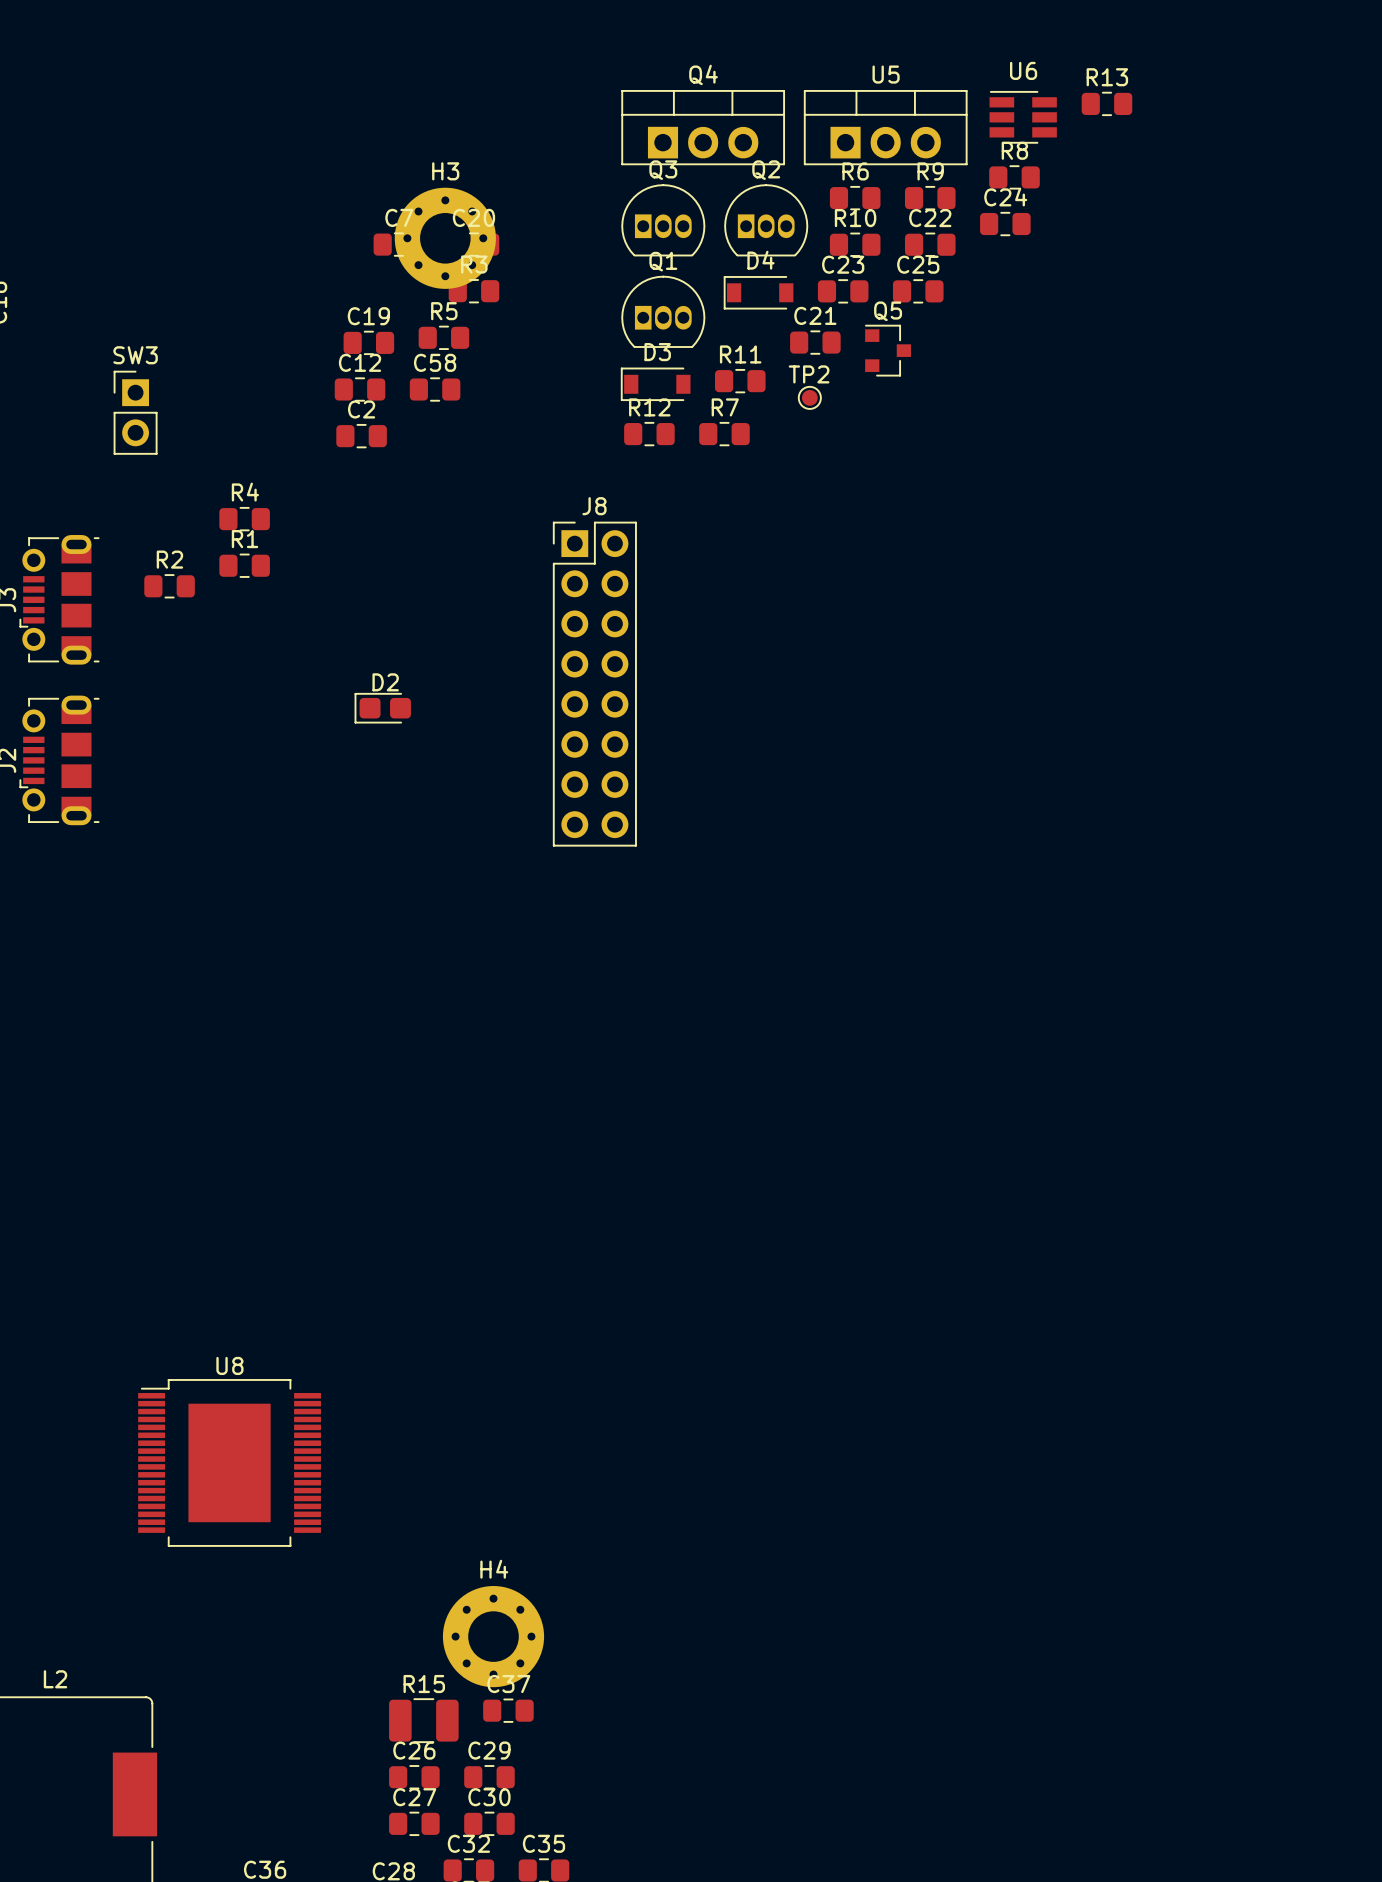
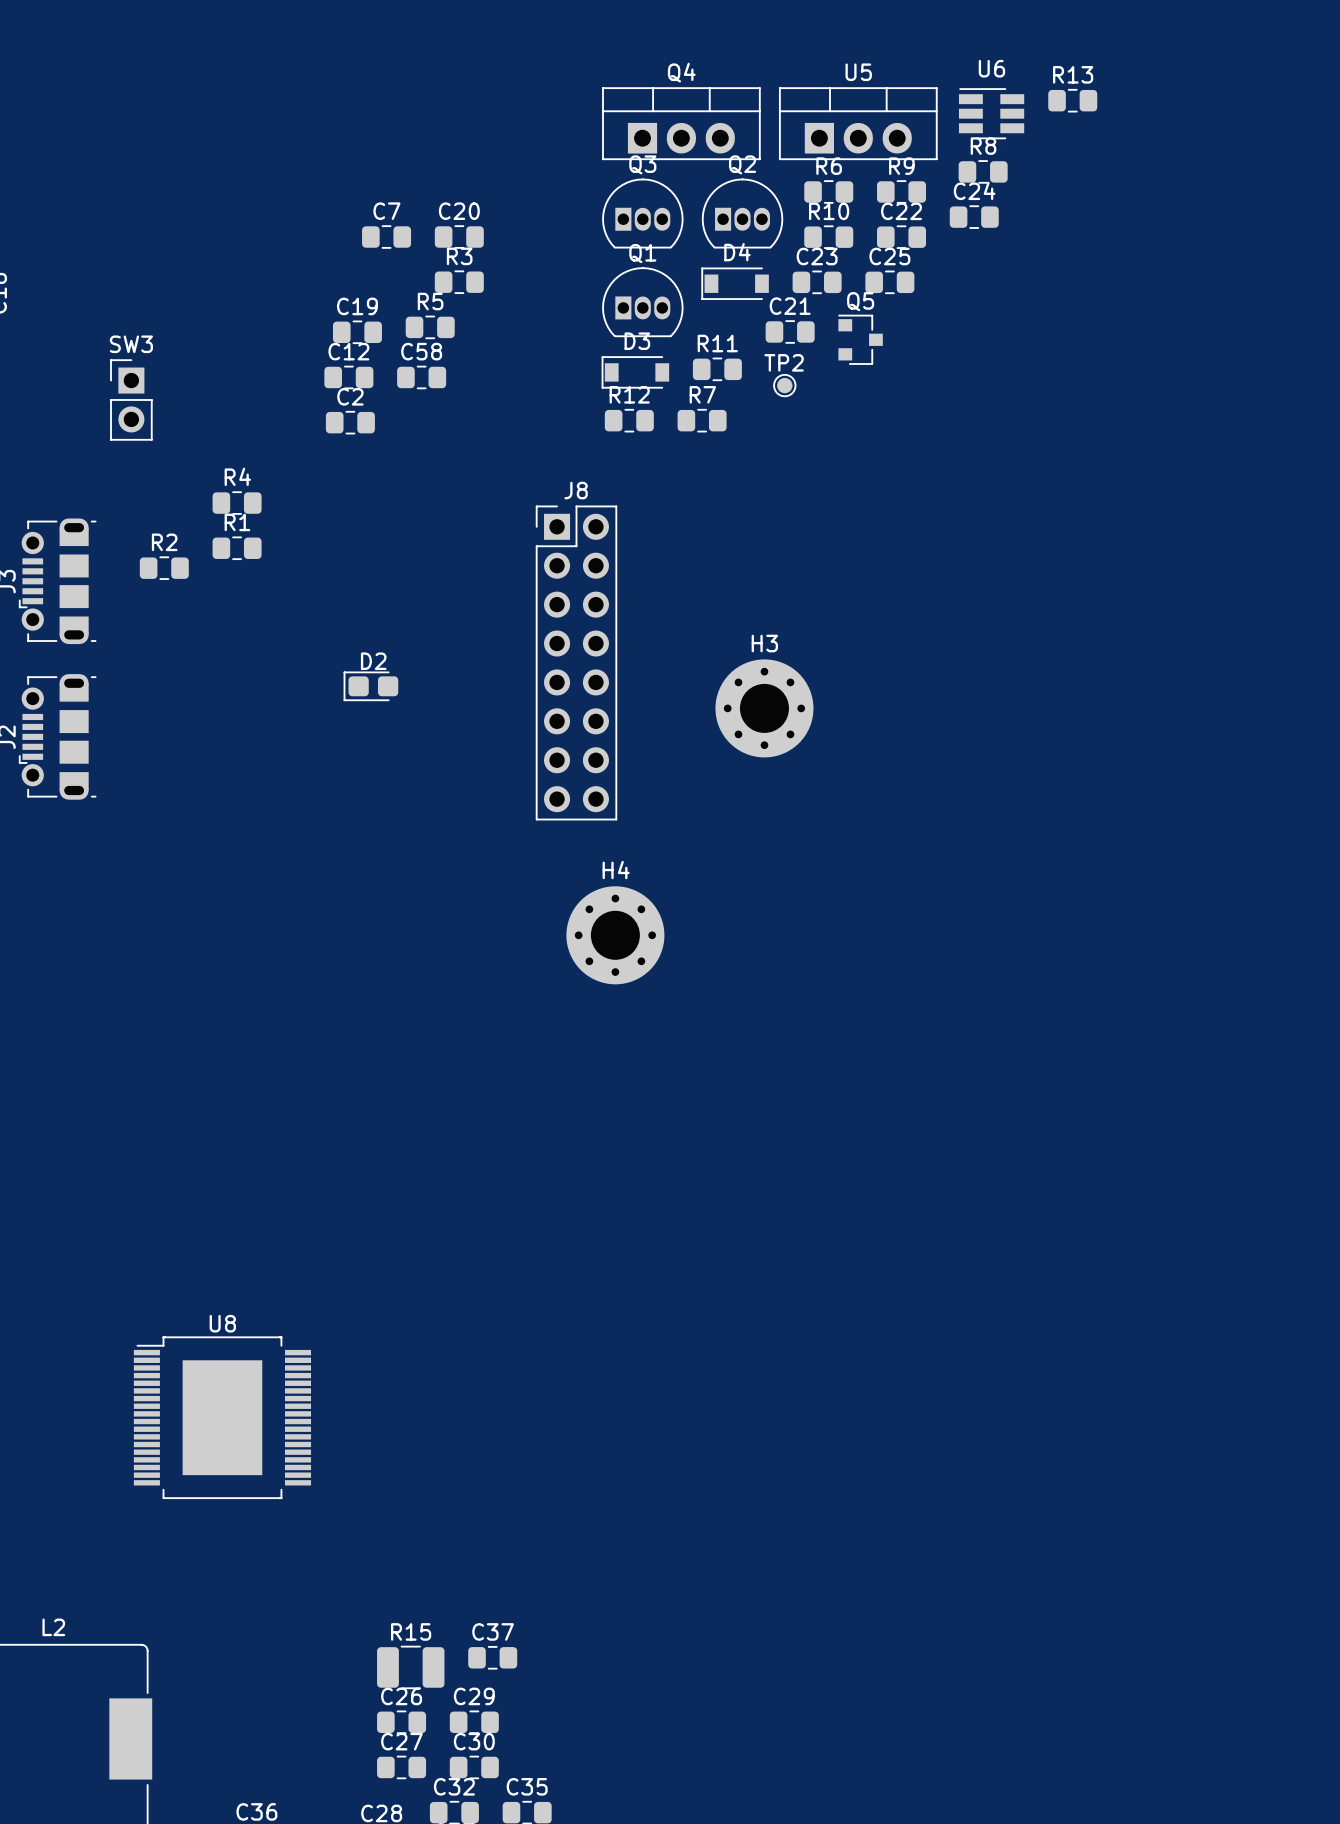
H3 position: (445, 238) -> (764, 708)
H4 position: (493, 1636) -> (615, 935)

